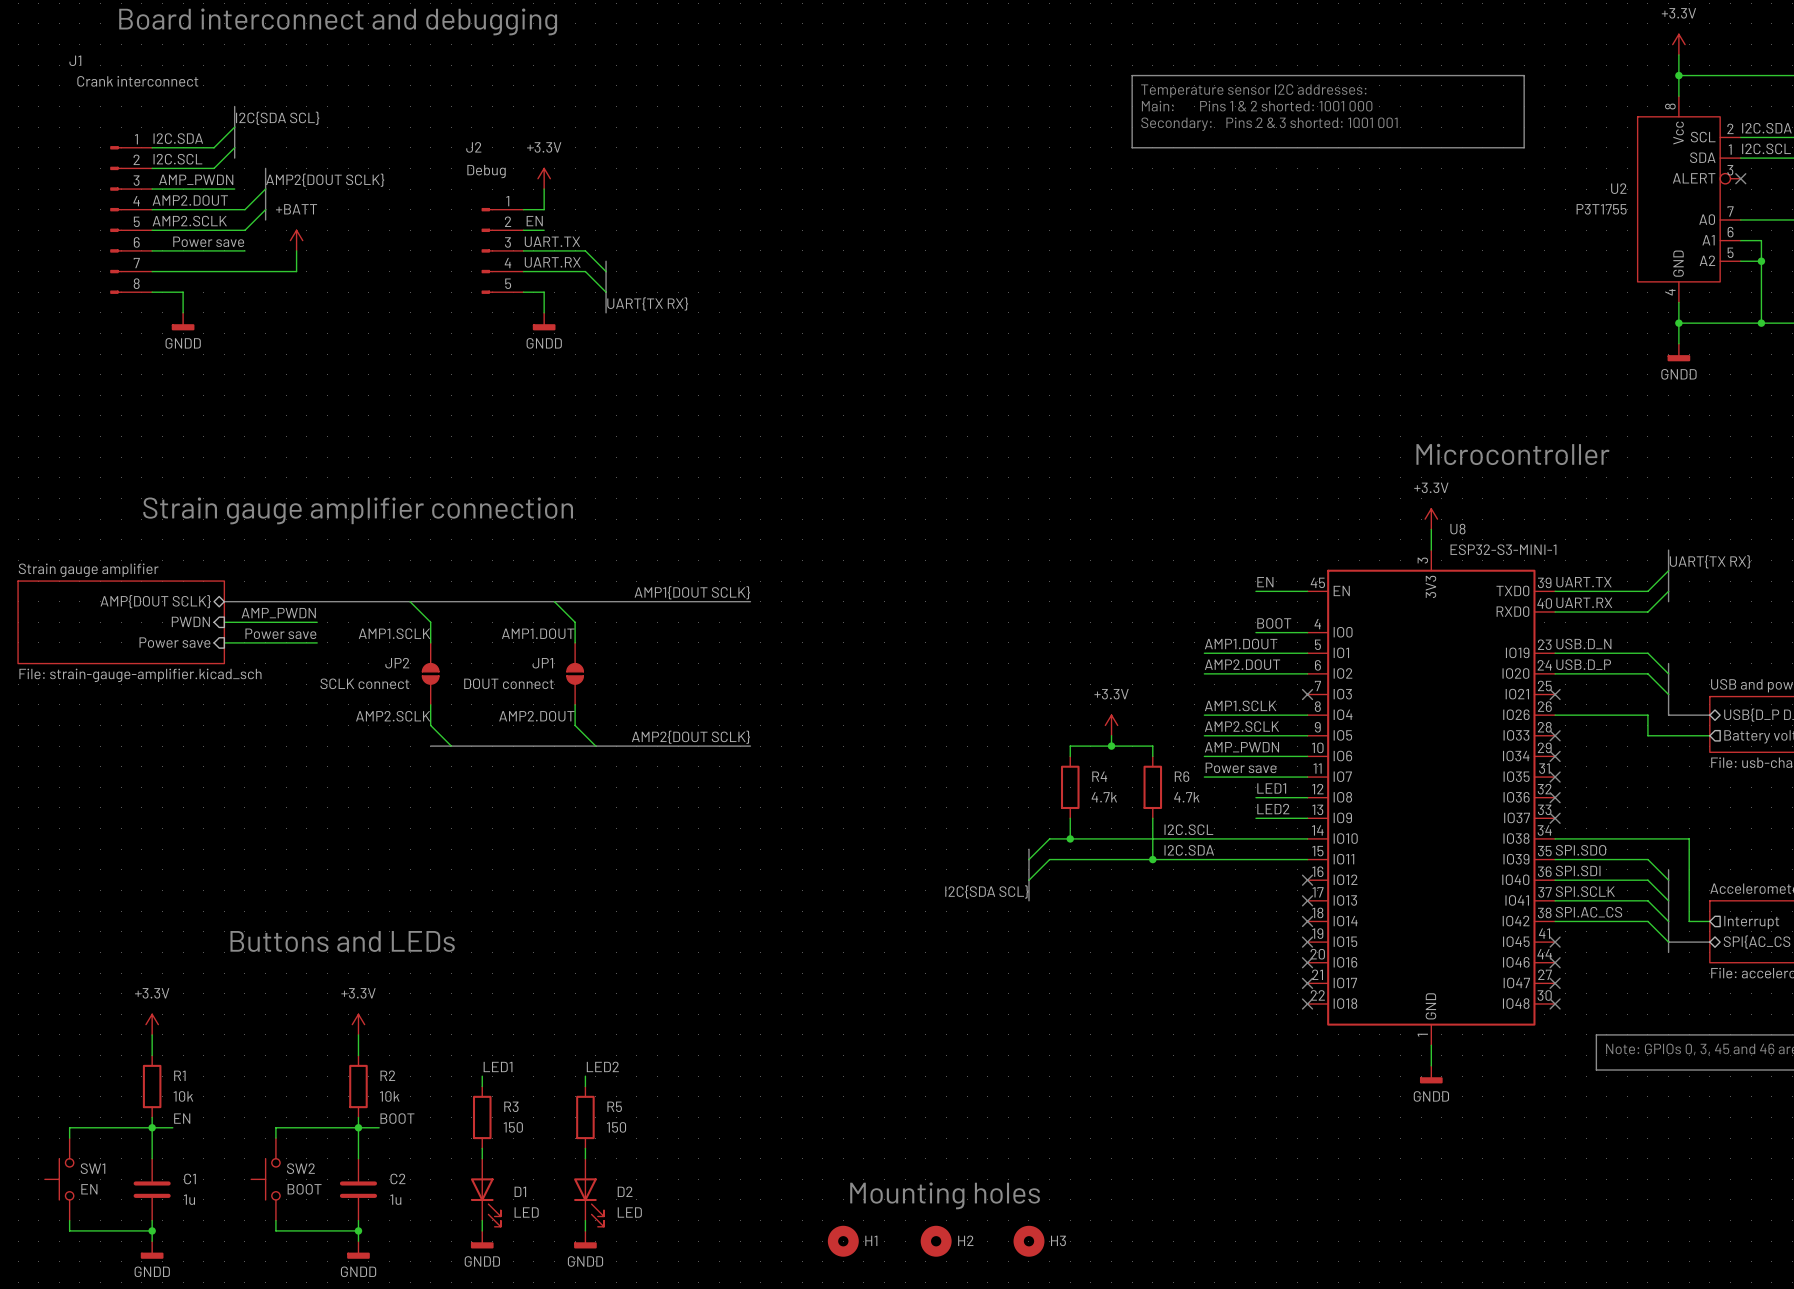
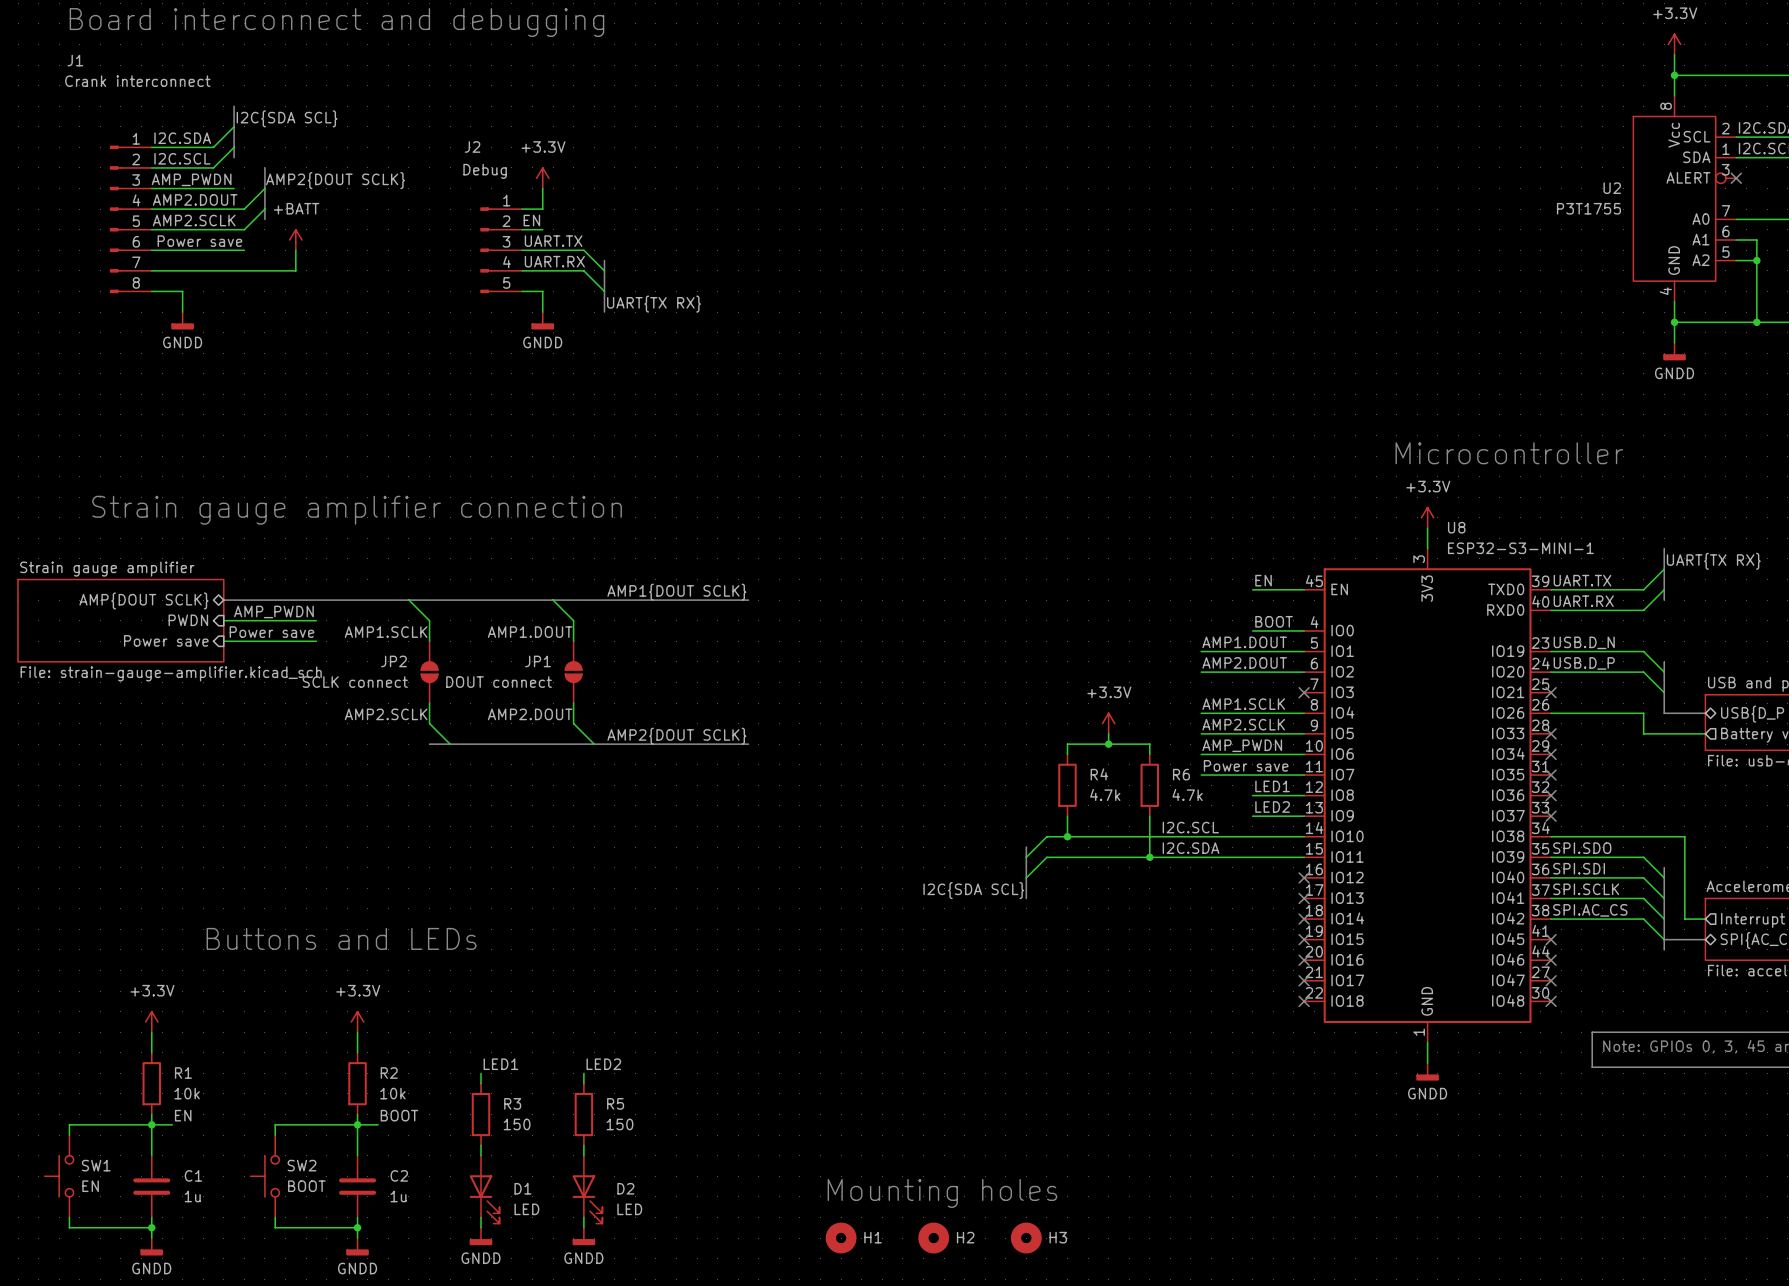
line: (1132, 75) (1524, 75) (1524, 147) (1132, 147) (1132, 75) -> none
text: Temperature sensor I2C addresses: (1253, 90) -> none
text: Main: Pins 1 & 2 shorted: 1001 000 (1257, 106) -> none
text: Secondary: Pins 2 & 3 shorted: 1001 001 (1269, 124) -> none

